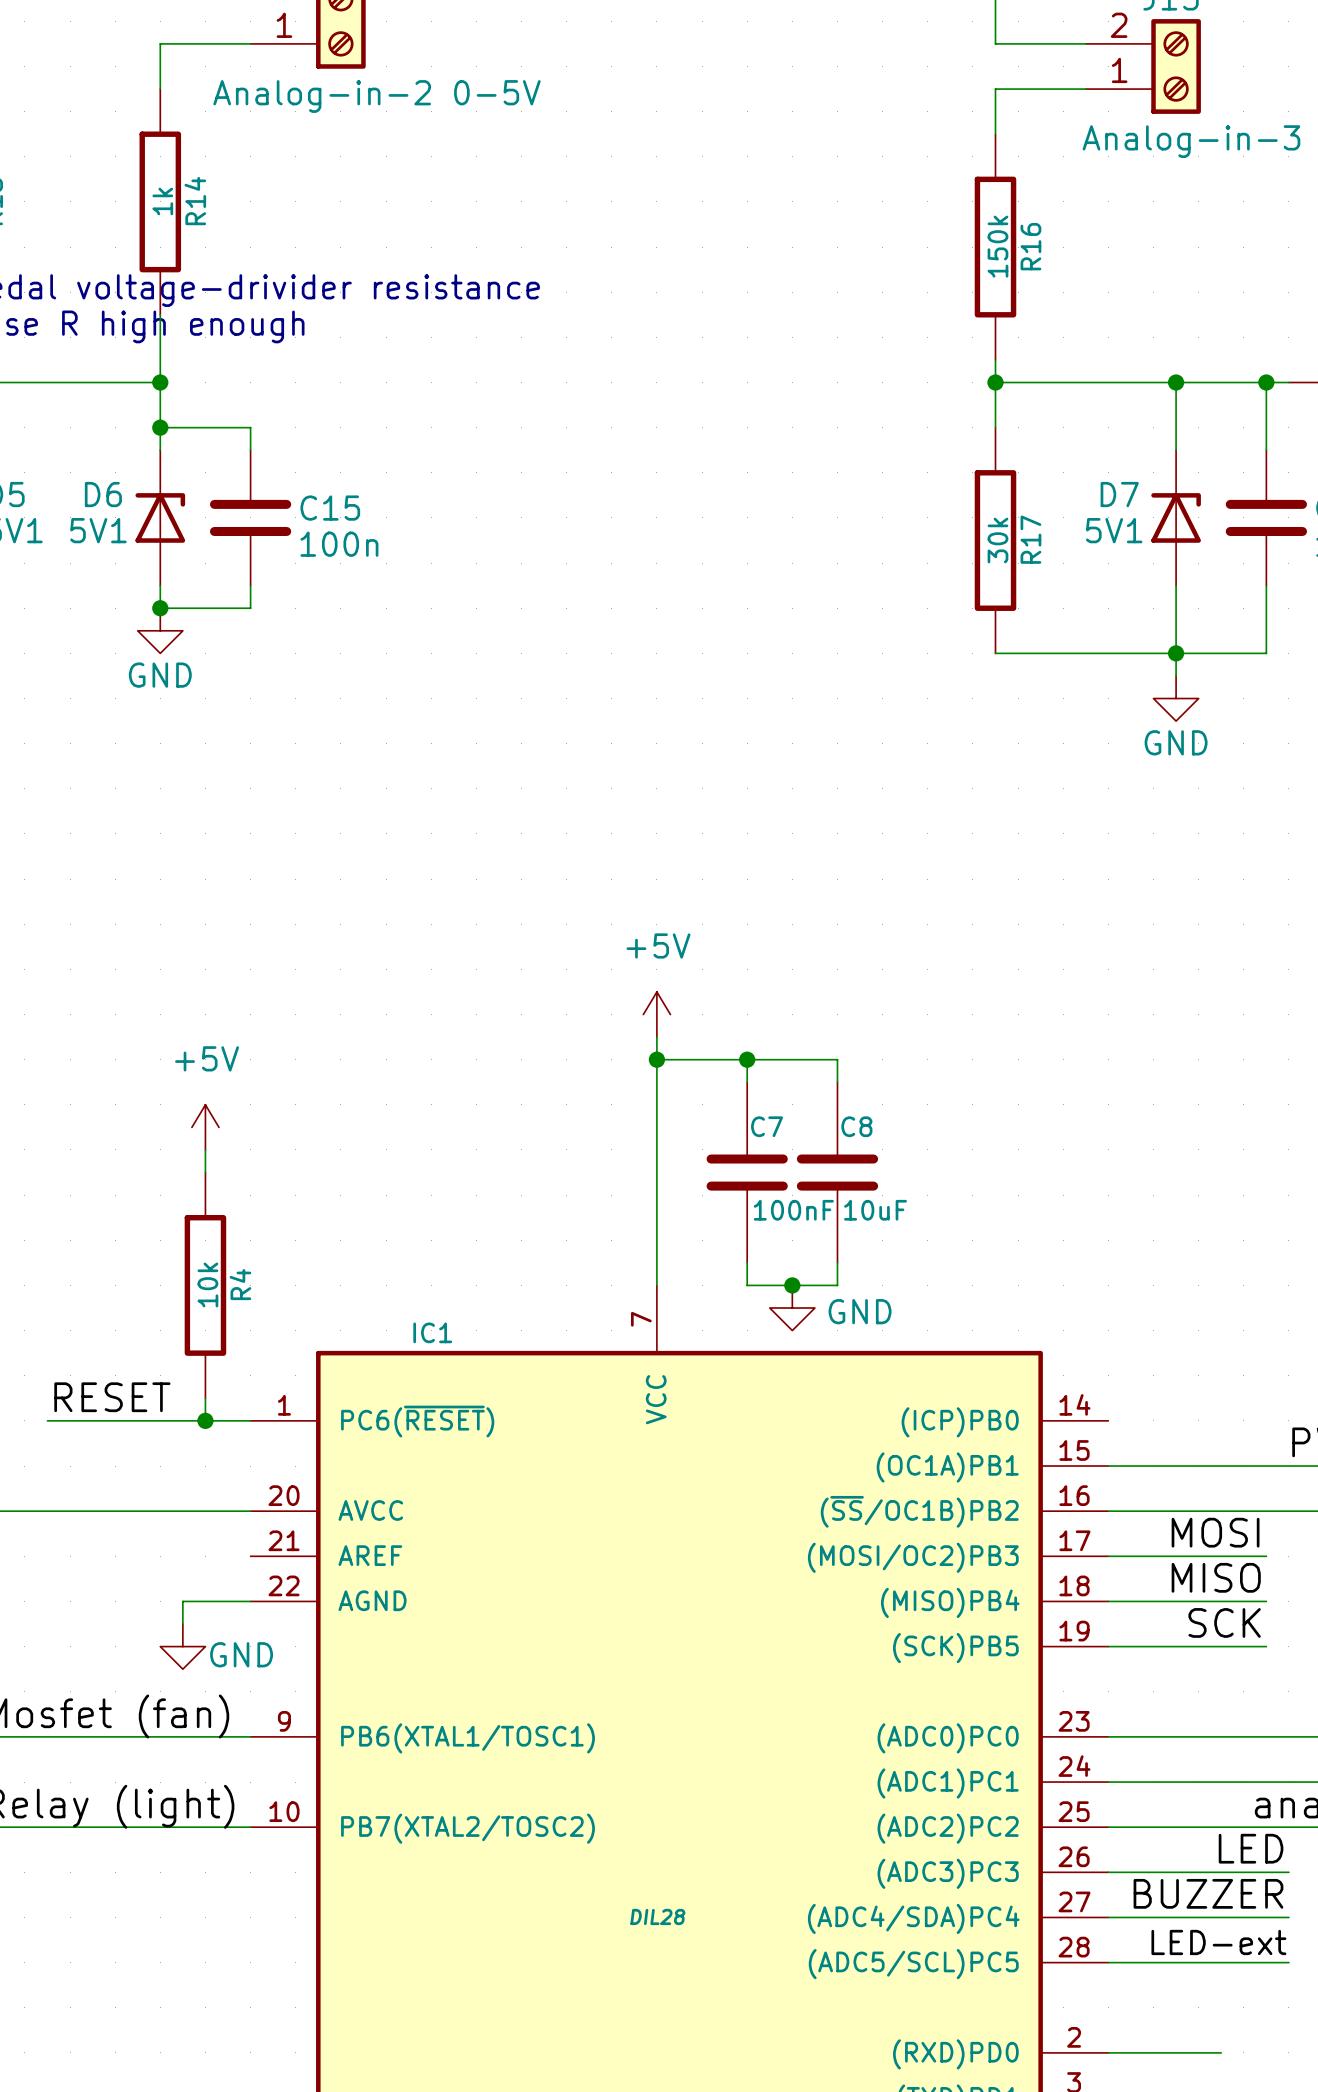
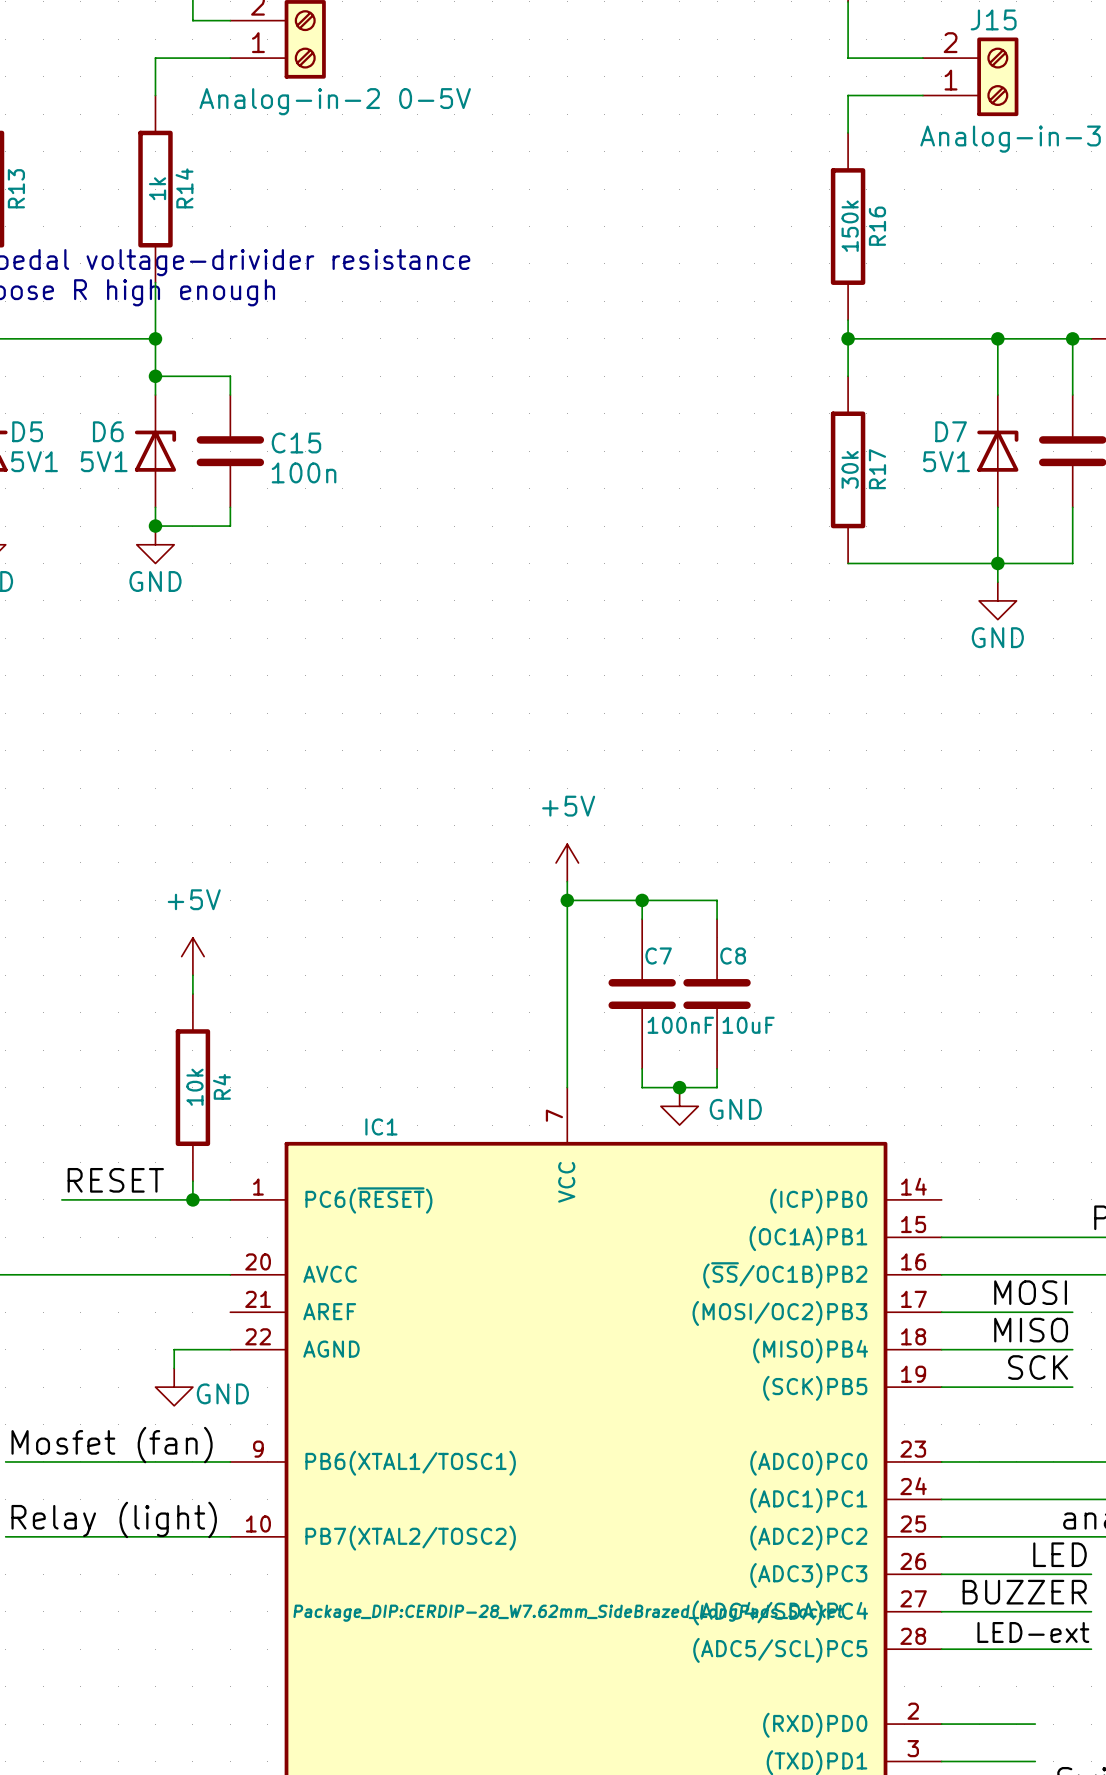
IC1 text: DIL28 (657, 1916) -> Package_DIP:CERDIP-28_W7.62mm_SideBrazed_LongPads_Socket (568, 1613)

